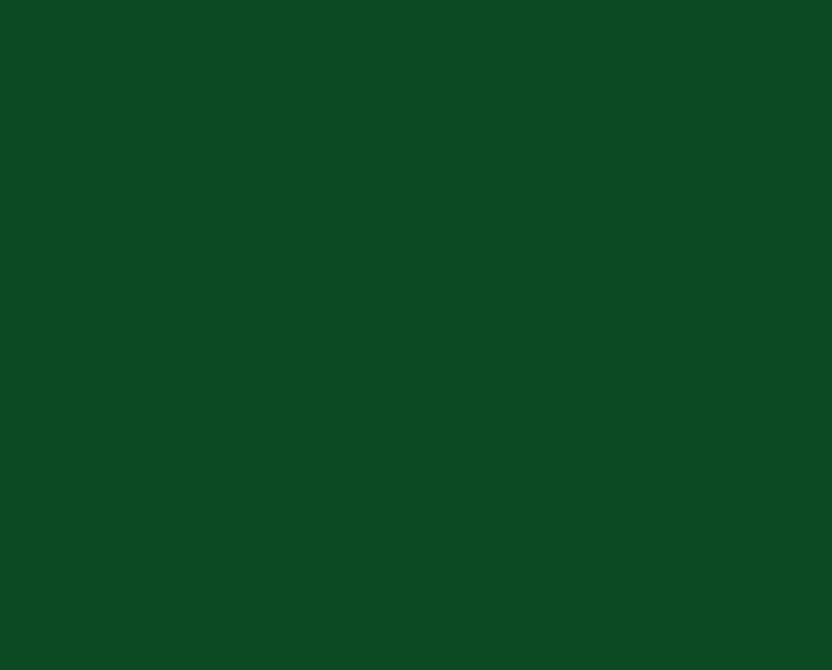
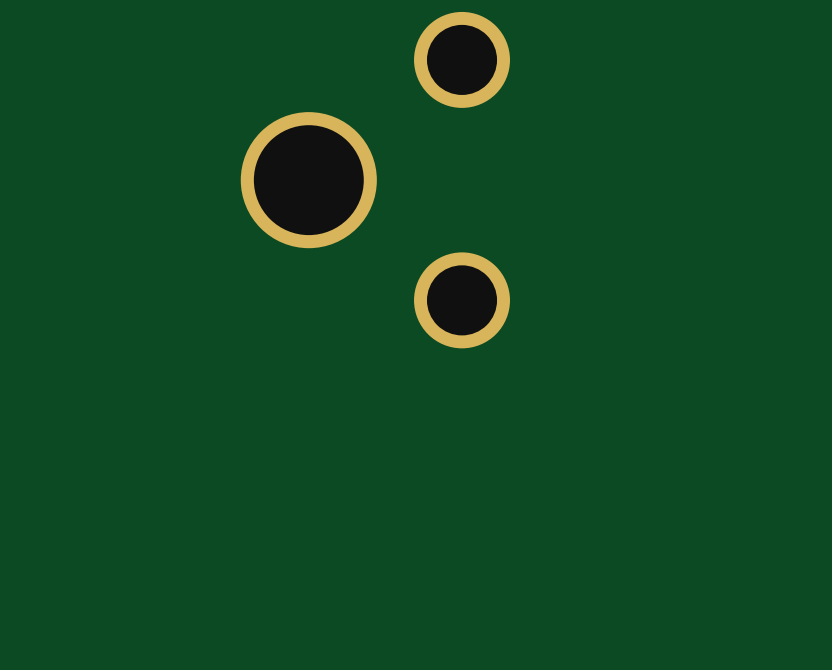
part: none -> (375, 180)

